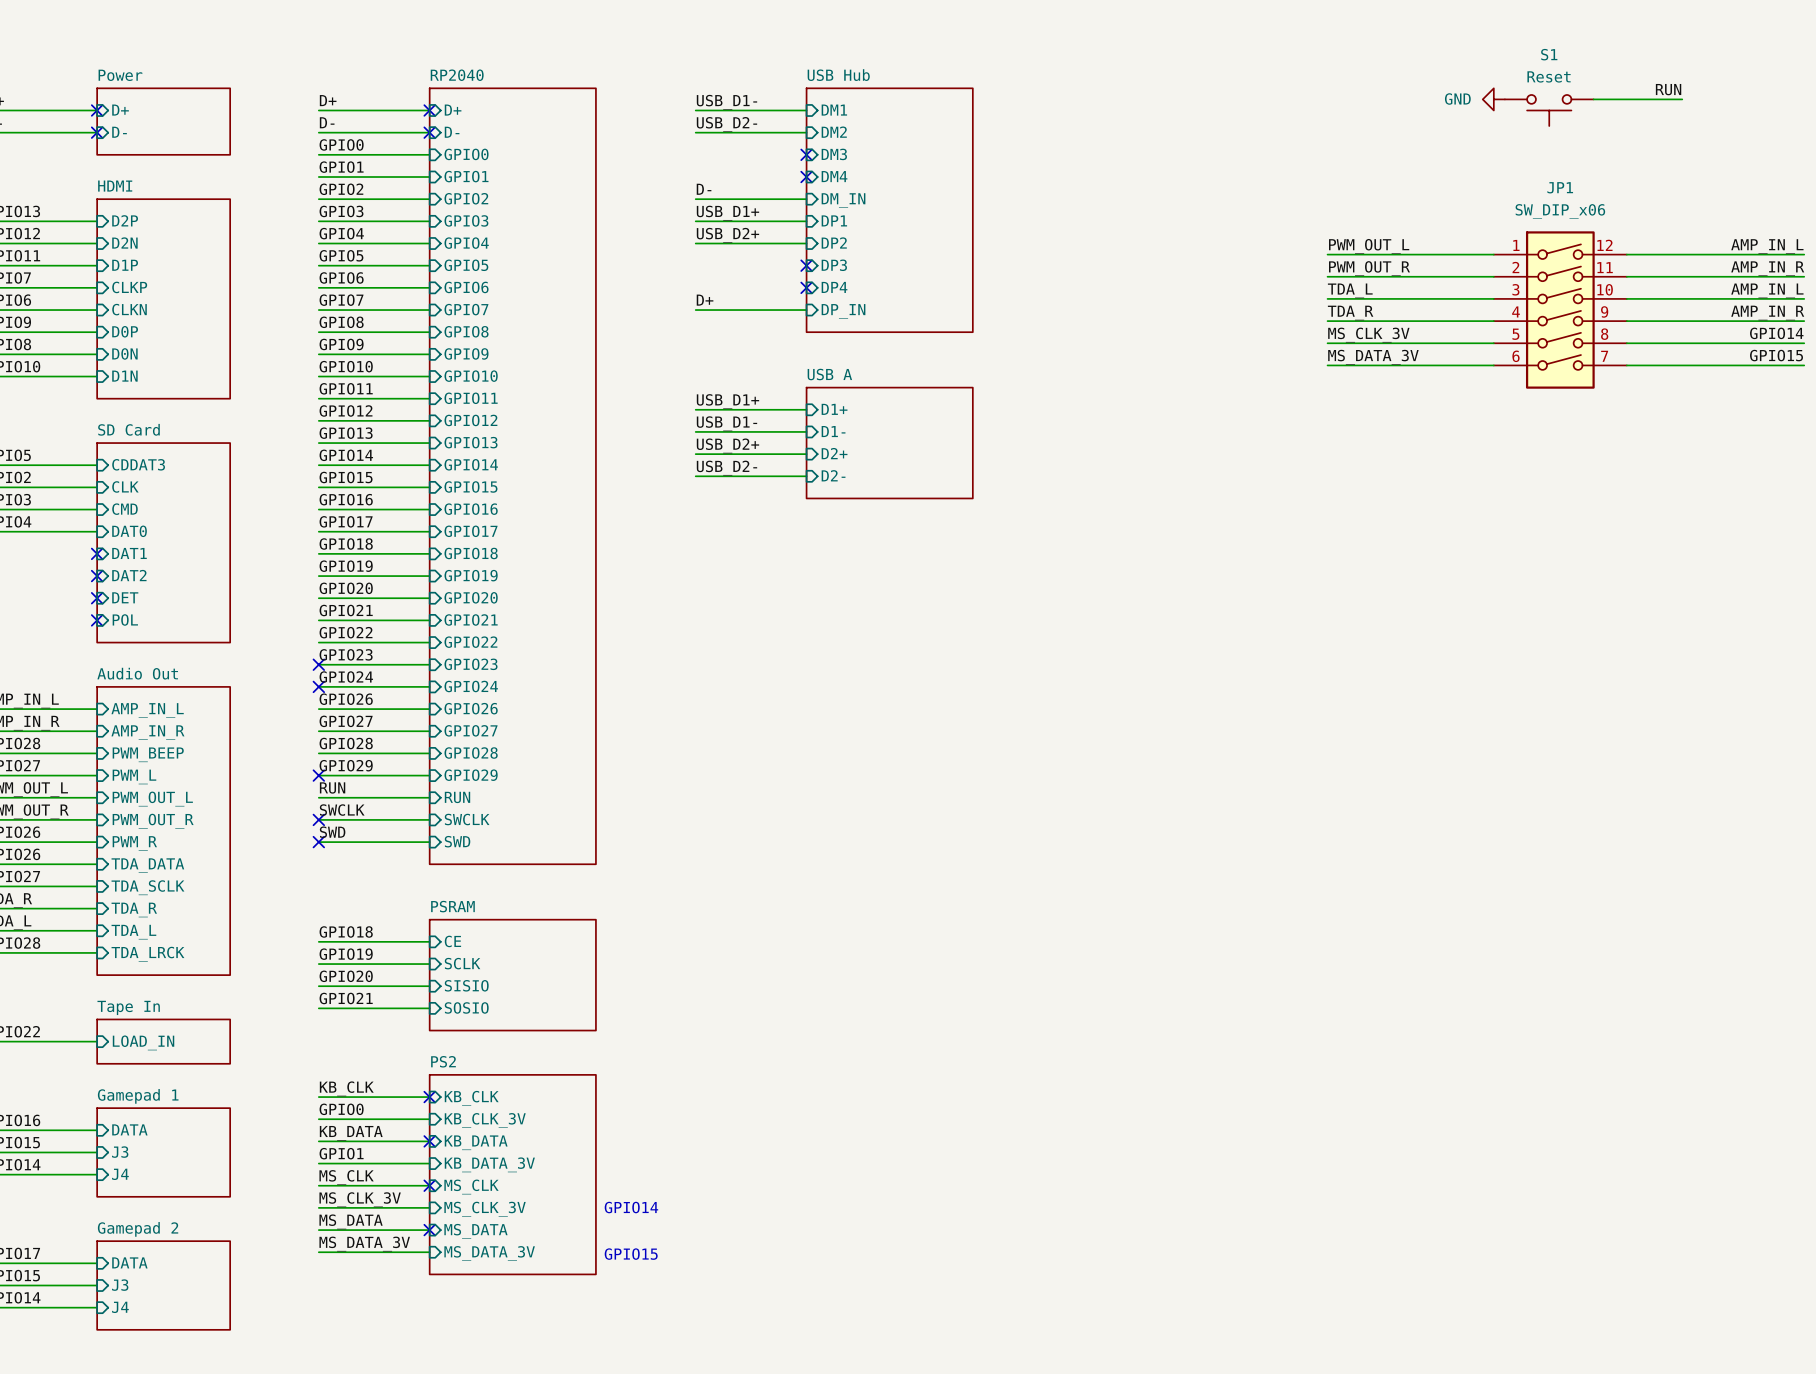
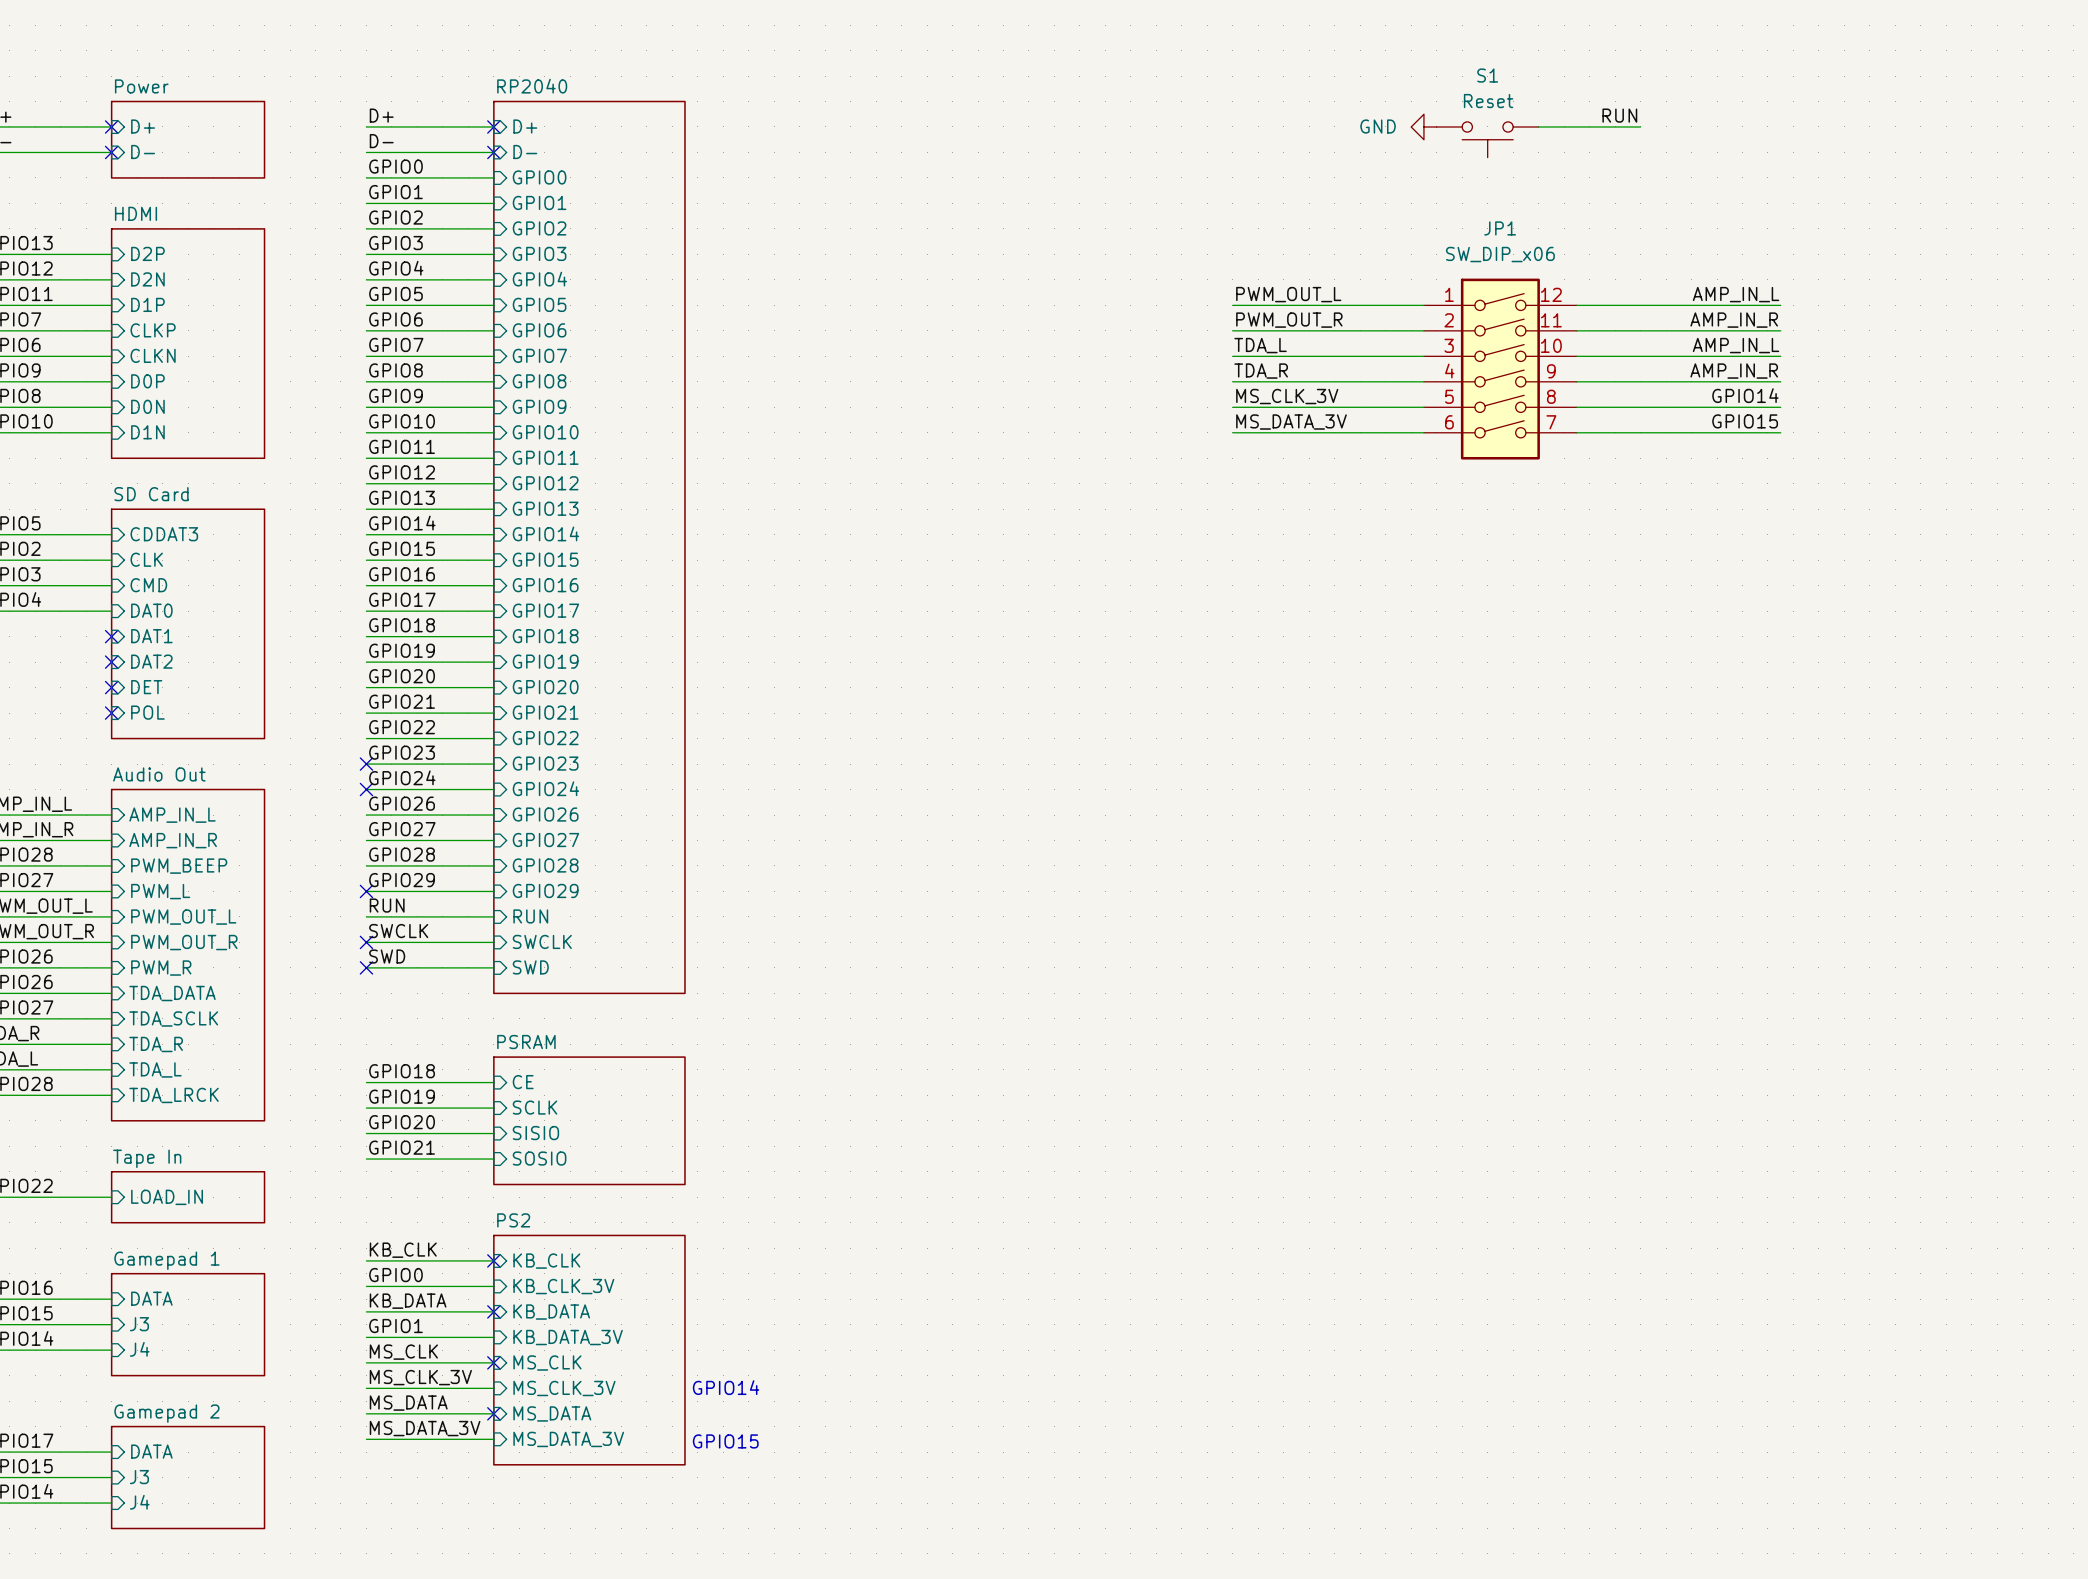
label: RUN (1668, 89) -> none
power symbol: GND (1493, 99) -> none
wire: (1593, 99) (1682, 99) -> none
label: none -> RUN (1619, 115)
label: USB_D1- (726, 102) -> none
wire: (695, 110) (806, 110) -> none
sheet pin: DM1 (834, 110) -> none
power symbol: none -> GND (1423, 126)
wire: none -> (1538, 126) (1640, 126)
S1 position: (1549, 110) -> (1487, 139)
label: USB_D2- (726, 124) -> none
wire: (695, 132) (806, 132) -> none
sheet pin: DM2 (834, 132) -> none
no-connect mark: (806, 154) -> none
sheet pin: DM3 (834, 154) -> none
sheet pin: DM4 (834, 176) -> none
no-connect mark: (806, 177) -> none
label: D- (704, 189) -> none
wire: (695, 199) (806, 199) -> none
sheet pin: DM_IN (843, 200) -> none
sheet USB Hub: (889, 210) -> none
label: USB_D1+ (727, 213) -> none
sheet pin: DP1 (834, 220) -> none
wire: (695, 221) (806, 221) -> none
label: USB_D2+ (727, 235) -> none
sheet pin: DP2 (834, 242) -> none
wire: (695, 243) (806, 243) -> none
label: PWM_OUT_L (1369, 246) -> none
label: AMP_IN_L (1767, 246) -> none
wire: (1327, 254) (1493, 254) -> none
wire: (1626, 254) (1804, 254) -> none
label: none -> PWM_OUT_L (1288, 294)
label: none -> AMP_IN_L (1736, 294)
no-connect mark: (806, 265) -> none
sheet pin: DP3 (834, 265) -> none
wire: none -> (1232, 305) (1423, 305)
wire: none -> (1576, 305) (1780, 305)
label: PWM_OUT_R (1369, 268) -> none
label: AMP_IN_R (1767, 268) -> none
wire: (1327, 276) (1493, 276) -> none
wire: (1626, 276) (1804, 276) -> none
label: none -> PWM_OUT_R (1289, 320)
label: none -> AMP_IN_R (1734, 320)
no-connect mark: (806, 287) -> none
sheet pin: DP4 (834, 287) -> none
wire: none -> (1232, 330) (1423, 330)
wire: none -> (1576, 330) (1780, 330)
label: TDA_L (1350, 290) -> none
label: AMP_IN_L (1767, 290) -> none
wire: (1327, 298) (1493, 298) -> none
wire: (1626, 298) (1804, 298) -> none
label: D+ (705, 300) -> none
label: none -> TDA_L (1260, 345)
label: none -> AMP_IN_L (1736, 345)
wire: (695, 310) (806, 310) -> none
wire: none -> (1232, 356) (1423, 356)
wire: none -> (1576, 356) (1780, 356)
JP1 position: (1560, 310) -> (1500, 369)
sheet pin: DP_IN (843, 311) -> none
label: TDA_R (1350, 313) -> none
label: AMP_IN_R (1767, 313) -> none
wire: (1327, 321) (1493, 321) -> none
wire: (1626, 321) (1804, 321) -> none
label: none -> TDA_R (1261, 371)
label: none -> AMP_IN_R (1734, 371)
wire: none -> (1232, 381) (1423, 381)
wire: none -> (1576, 381) (1780, 381)
label: GPIO14 (1776, 333) -> none
label: MS_CLK_3V (1368, 335) -> none
wire: (1327, 343) (1493, 343) -> none
wire: (1626, 343) (1804, 343) -> none
label: none -> GPIO14 (1745, 395)
label: none -> MS_CLK_3V (1287, 396)
wire: none -> (1232, 407) (1423, 407)
wire: none -> (1576, 407) (1780, 407)
label: GPIO15 (1776, 355) -> none
label: MS_DATA_3V (1373, 357) -> none
wire: (1327, 365) (1493, 365) -> none
wire: (1626, 365) (1804, 365) -> none
label: none -> GPIO15 (1745, 421)
label: none -> MS_DATA_3V (1291, 422)
wire: none -> (1232, 432) (1423, 432)
wire: none -> (1576, 432) (1780, 432)
label: USB_D1+ (727, 401) -> none
wire: (695, 409) (806, 409) -> none
sheet pin: D1+ (834, 409) -> none
label: USB_D1- (726, 423) -> none
wire: (695, 431) (806, 431) -> none
sheet pin: D1- (833, 431) -> none
sheet USB A: (889, 443) -> none
label: USB_D2+ (727, 445) -> none
sheet pin: D2+ (834, 453) -> none
wire: (695, 454) (806, 454) -> none
label: USB_D2- (726, 468) -> none
sheet pin: D2- (833, 475) -> none
wire: (695, 476) (806, 476) -> none

